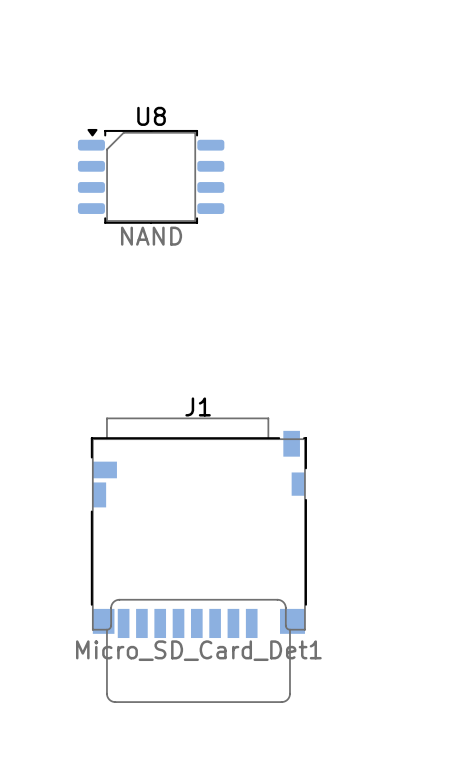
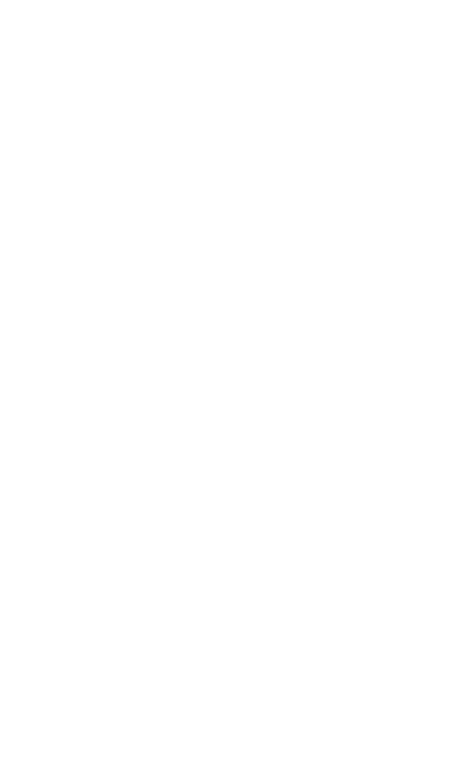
U8: NAND (151, 176) -> none
J1: Micro_SD_Card_Det1 (198, 560) -> none

